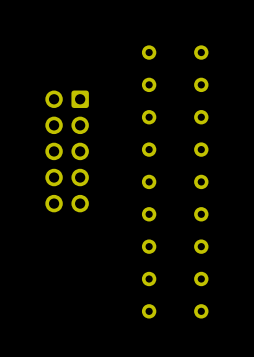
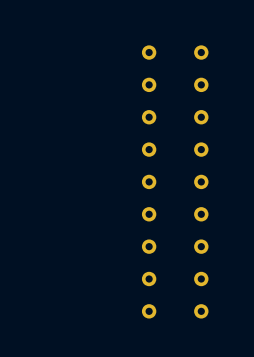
part: (67, 151) -> none

